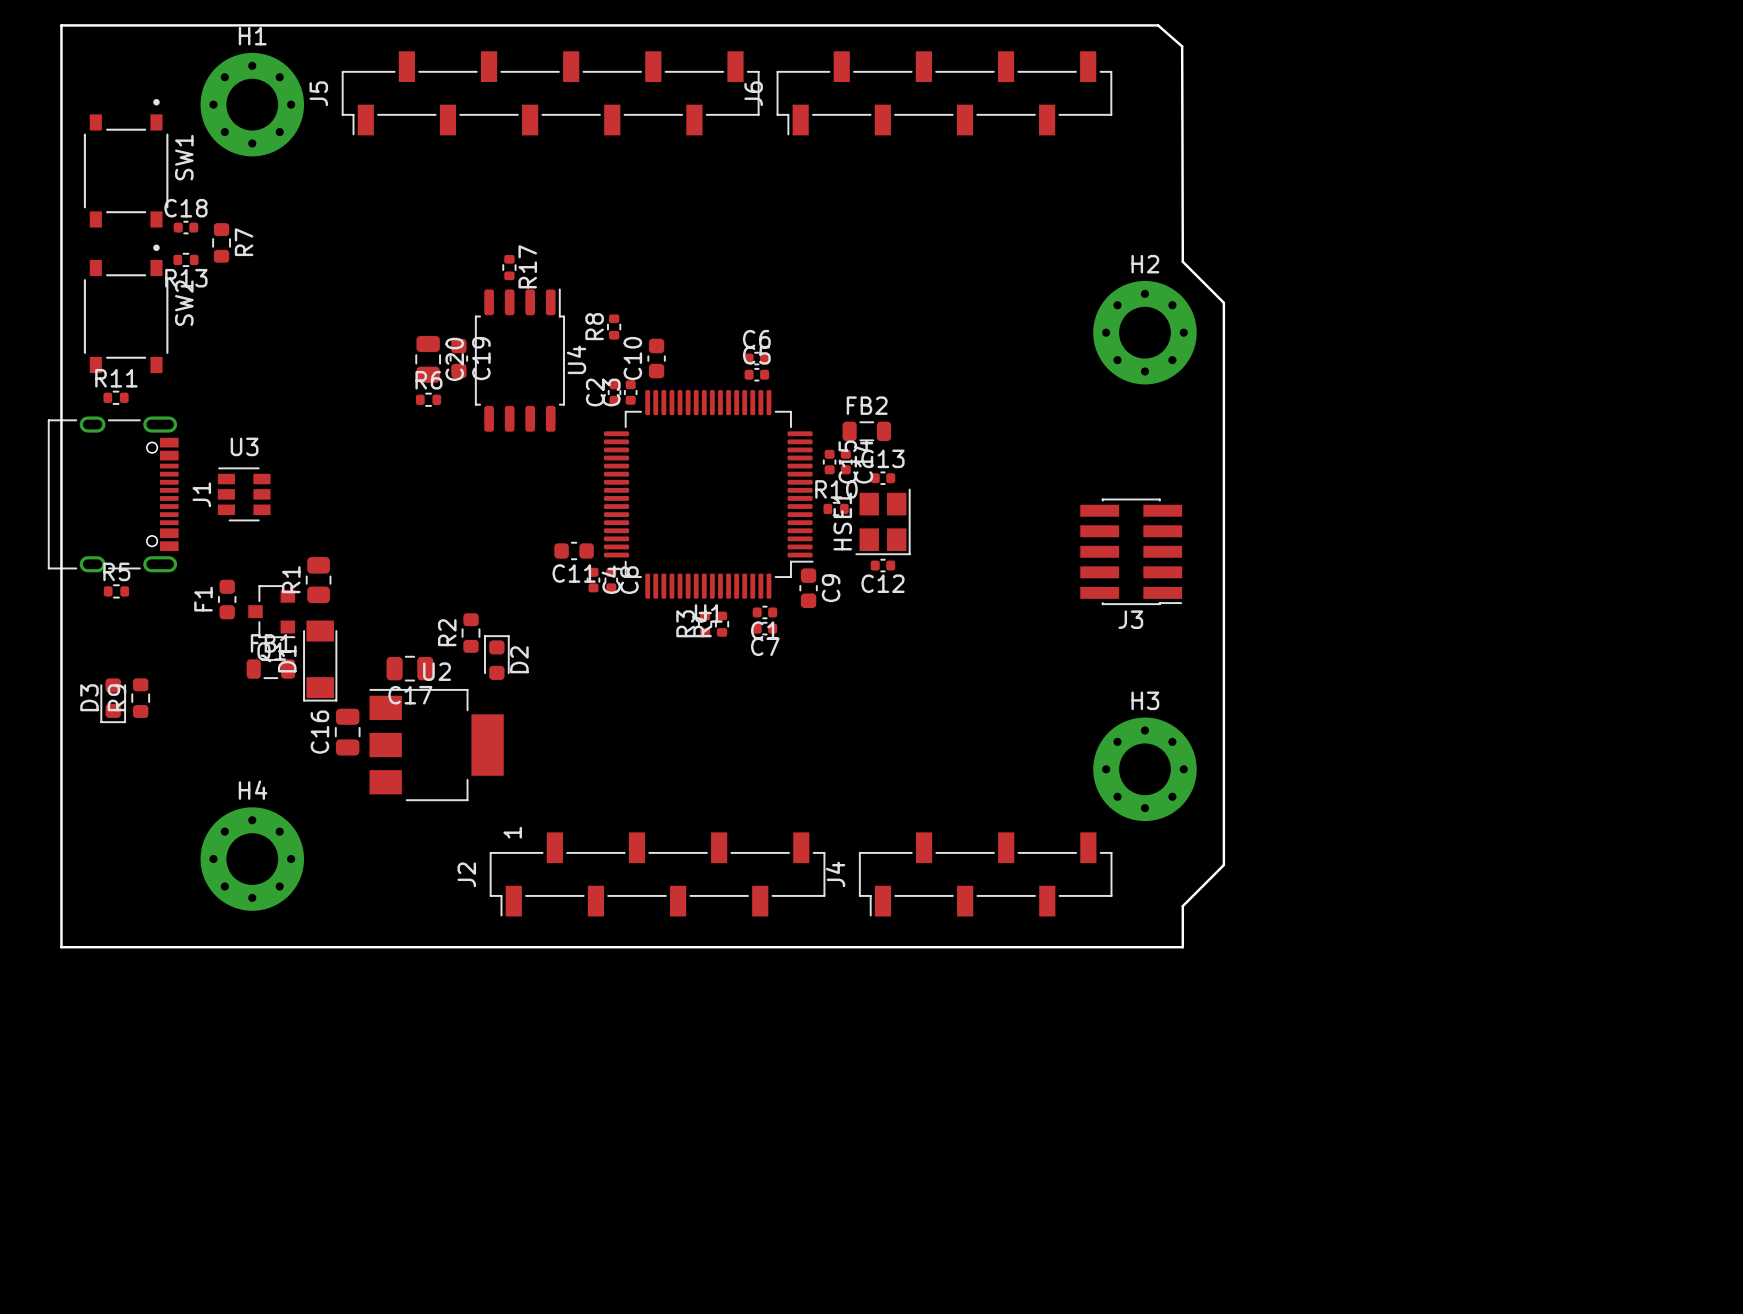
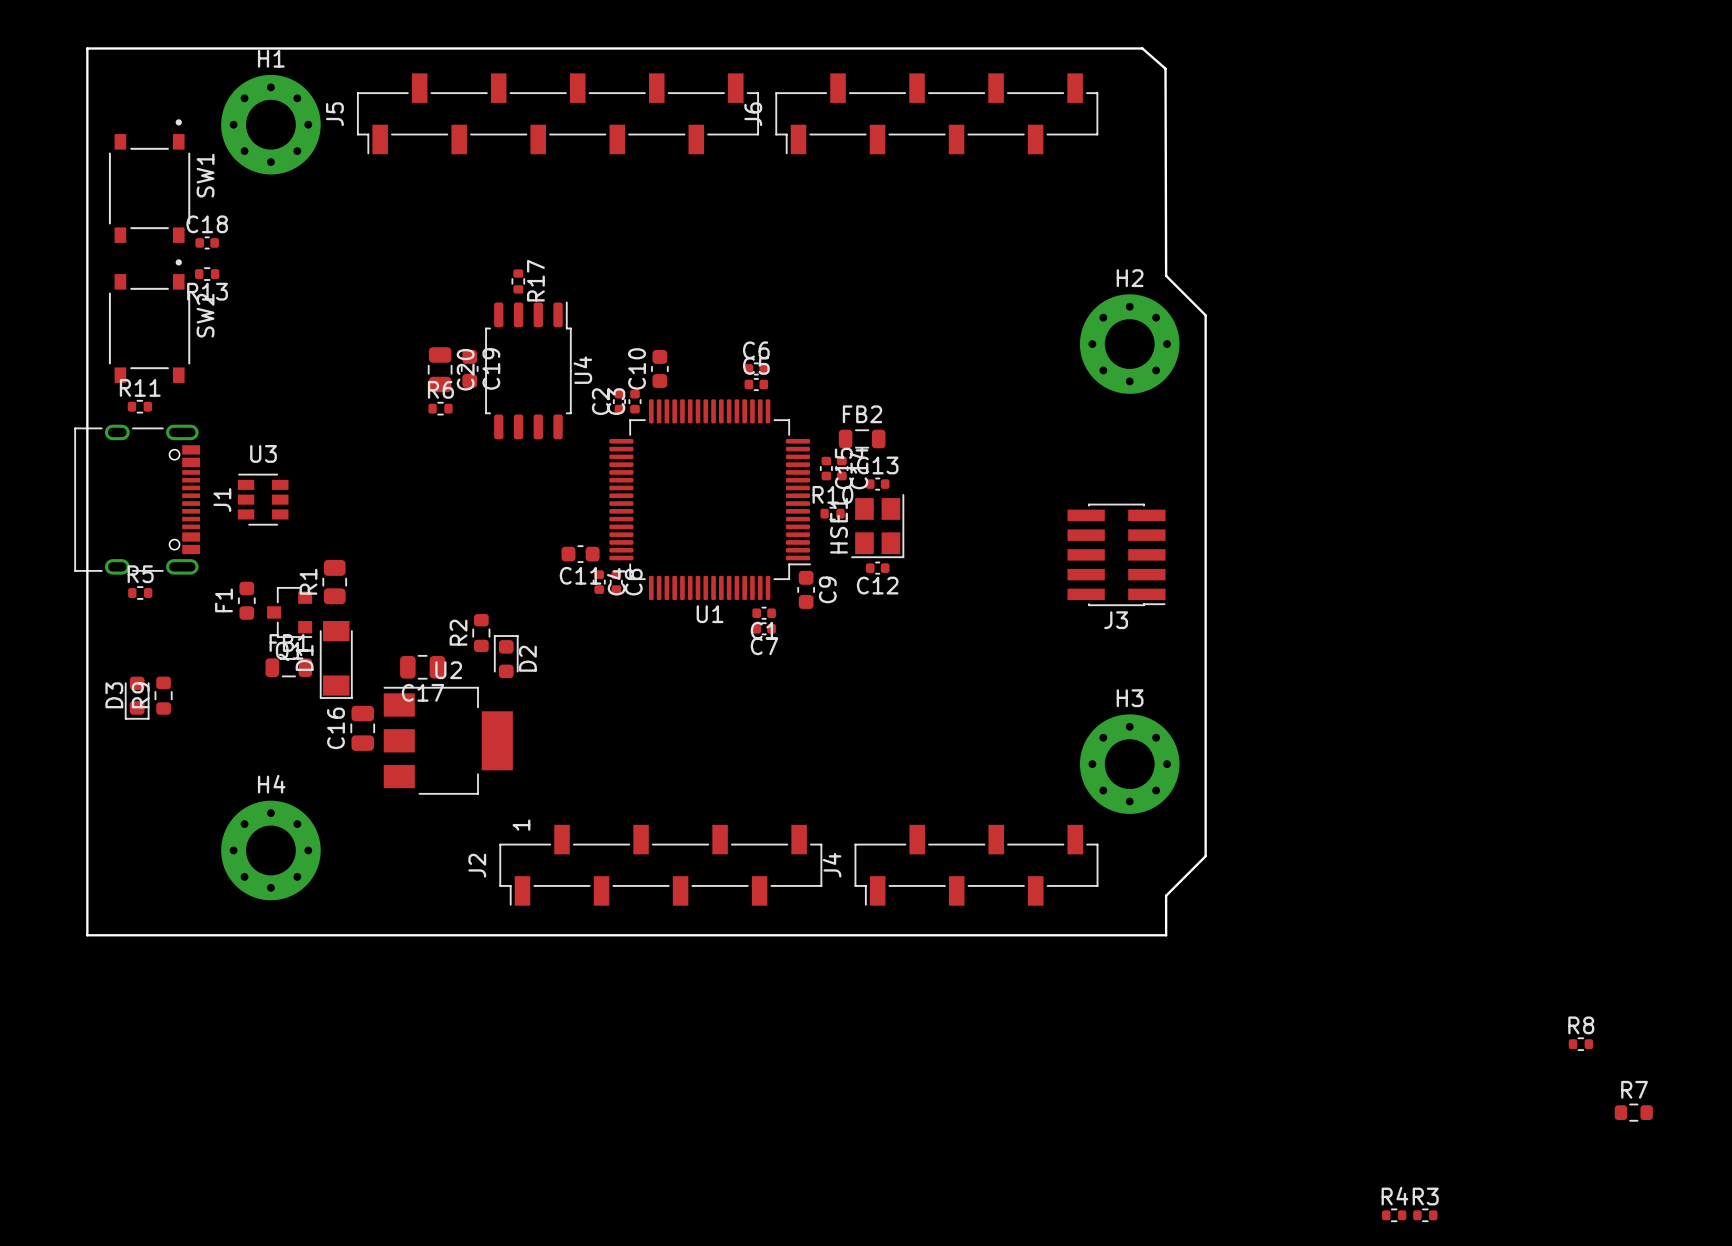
R7 rotation: 0° (221, 242) -> 90° clockwise (1633, 1112)
R7 position: (221, 242) -> (1633, 1112)
R7 name position: R7 (244, 242) -> R7 (1634, 1089)
R8 rotation: 0° (614, 327) -> 90° clockwise (1580, 1044)
R8 position: (614, 327) -> (1580, 1044)
R3 rotation: 0° (705, 624) -> 90° clockwise (1425, 1215)
R3 position: (705, 624) -> (1425, 1215)
R4 rotation: 0° (722, 624) -> 90° clockwise (1394, 1215)
R4 position: (722, 624) -> (1394, 1215)

